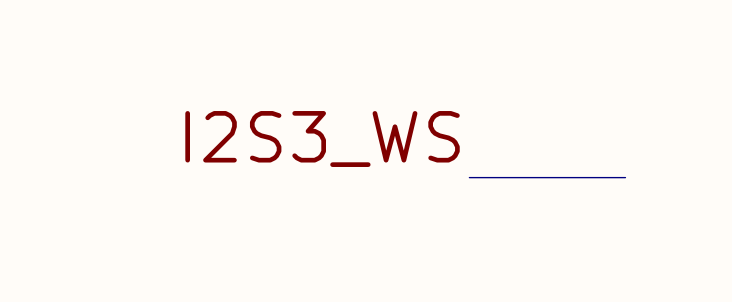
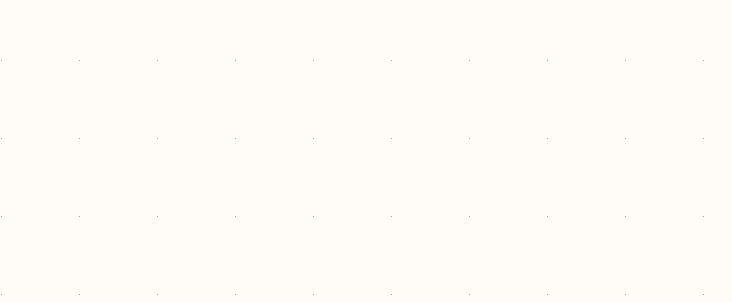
label: I2S3_WS (322, 139) -> none
wire: (469, 177) (625, 177) -> none

